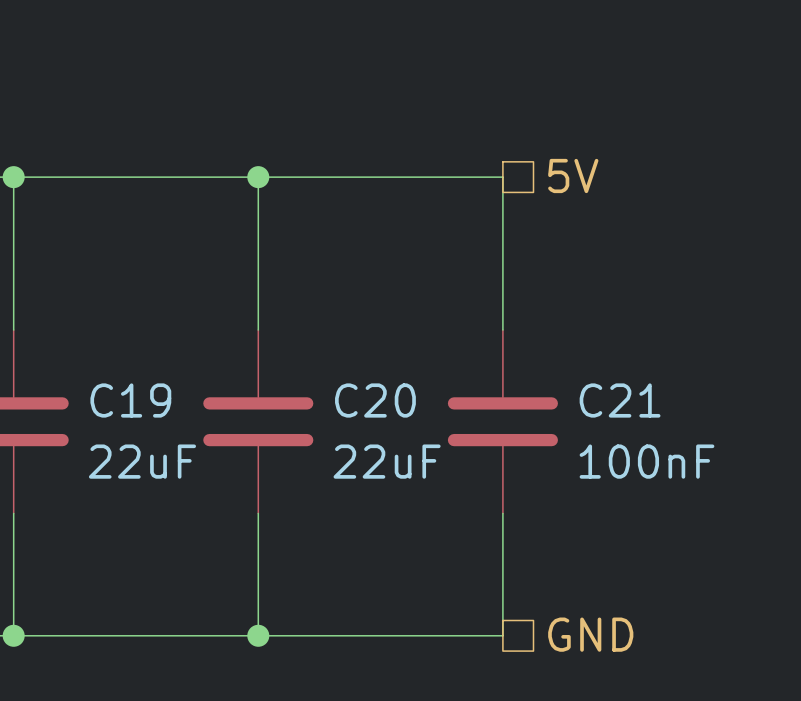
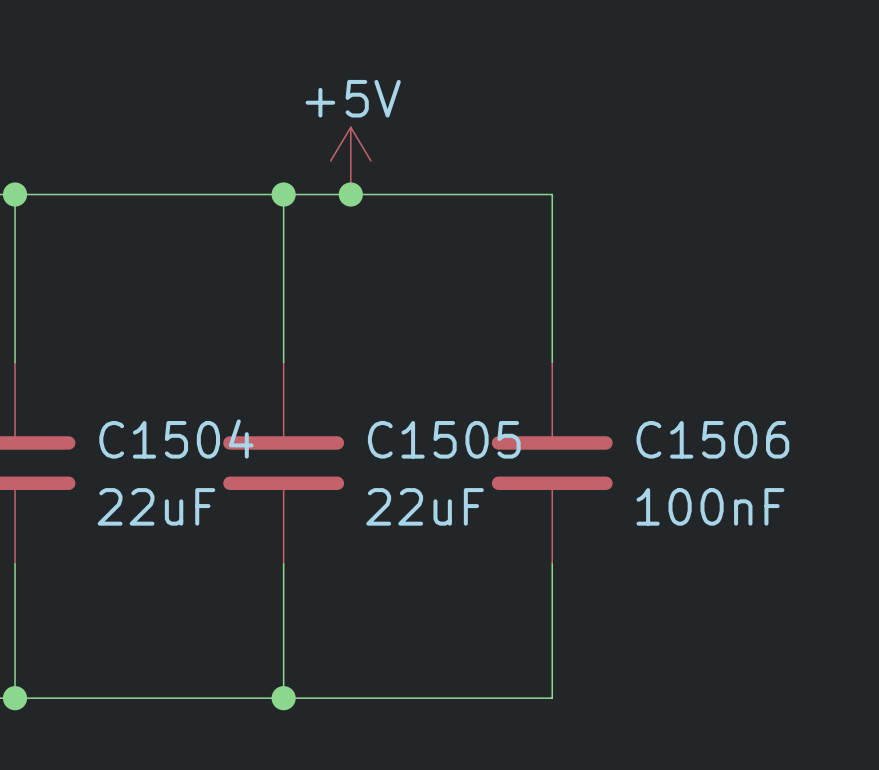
power symbol: none -> +5V (350, 160)
hierarchical label: 5V (573, 175) -> none
junction: none -> (350, 194)
C19 name: C19 (130, 400) -> C1504 (176, 439)
C20 name: C20 (375, 400) -> C1505 (444, 439)
C21 name: C21 (620, 400) -> C1506 (712, 439)
hierarchical label: GND (590, 634) -> none

